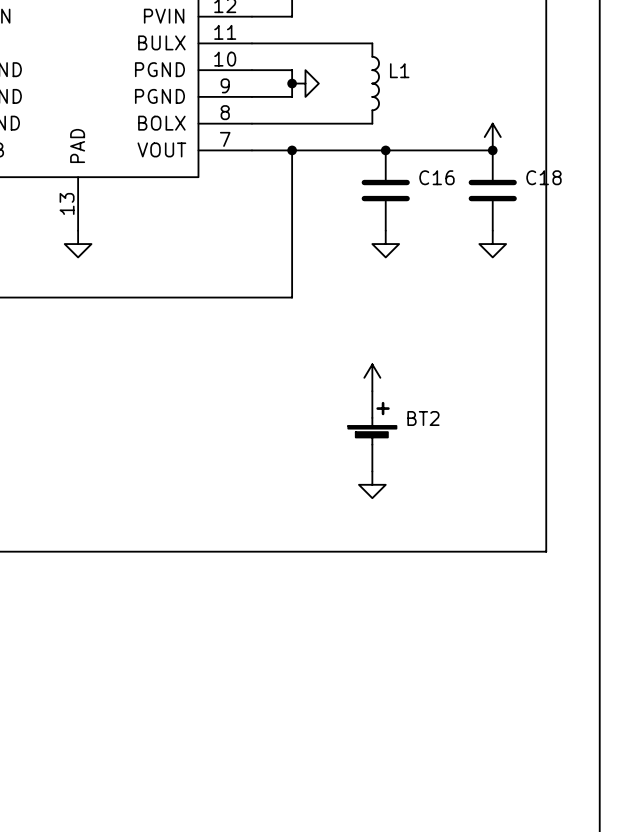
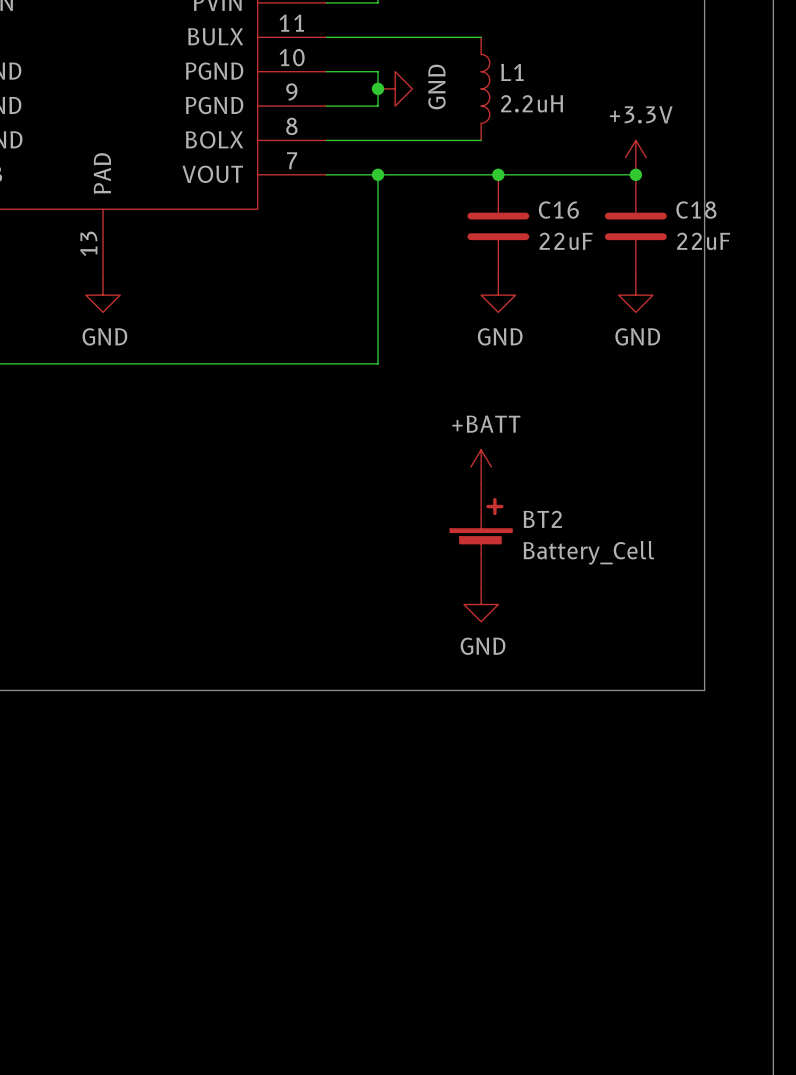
power symbol text: none -> GND (436, 87)
L1 value: none -> 2.2uH (532, 103)
power symbol text: none -> +3.3V (641, 114)
C16 value: none -> 22uF (566, 241)
C18 value: none -> 22uF (703, 241)
power symbol text: none -> GND (104, 336)
power symbol text: none -> GND (500, 336)
power symbol text: none -> GND (637, 336)
power symbol text: none -> +BATT (486, 424)
BT2 value: none -> Battery_Cell (588, 552)
power symbol text: none -> GND (483, 646)

